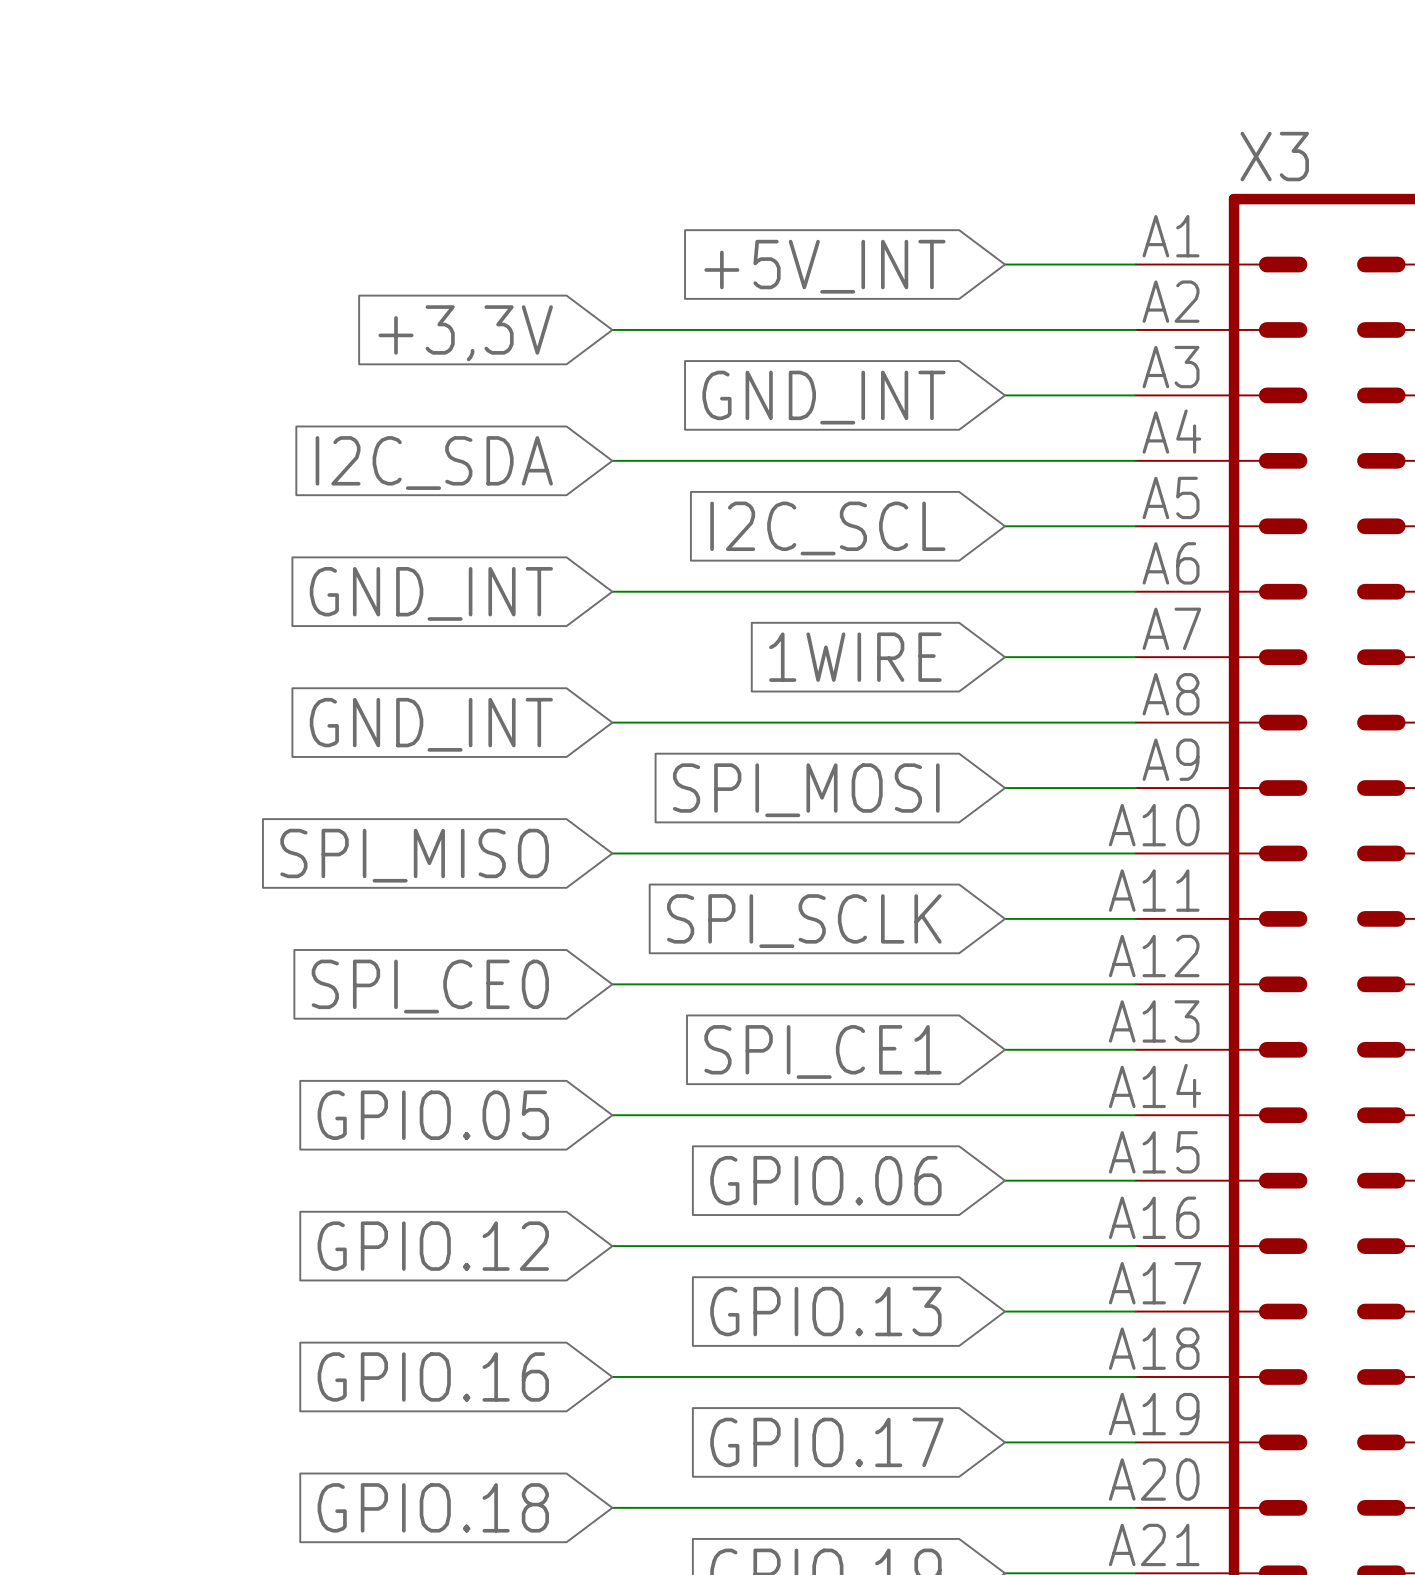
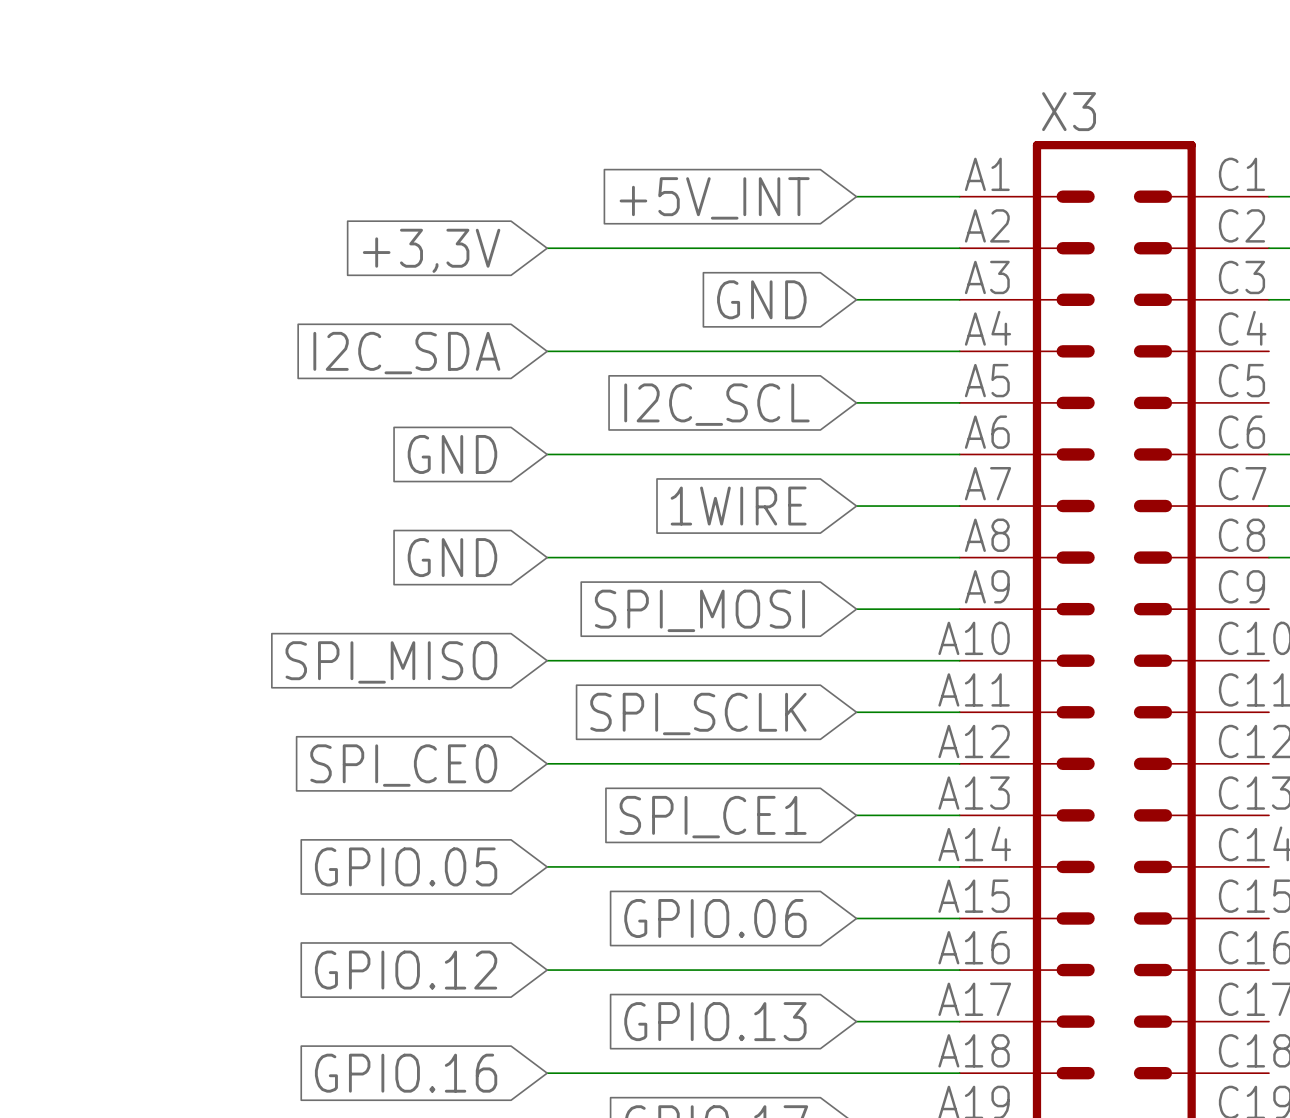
global label: GND_INT (823, 397) -> GND (761, 299)
global label: GND_INT (431, 593) -> GND (452, 454)
global label: GND_INT (431, 724) -> GND (452, 557)

